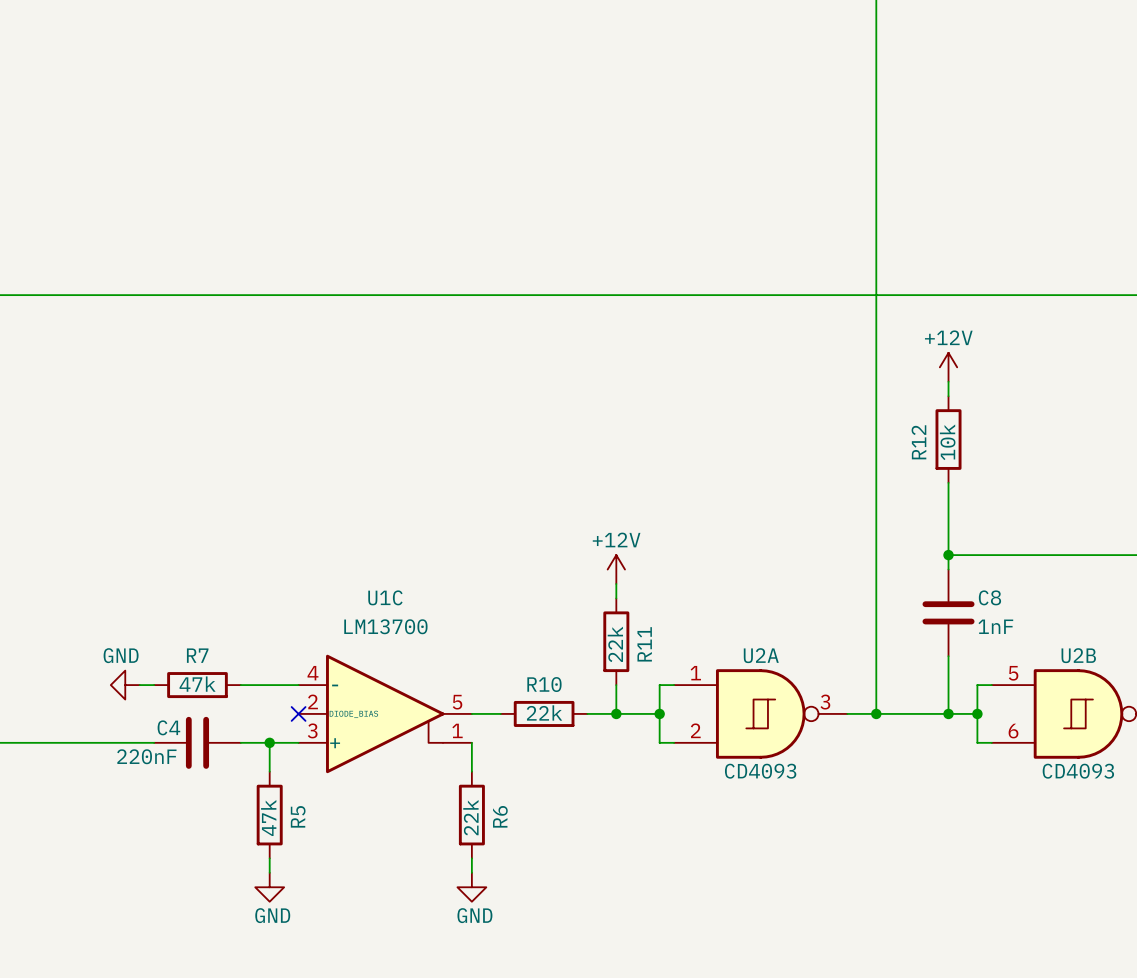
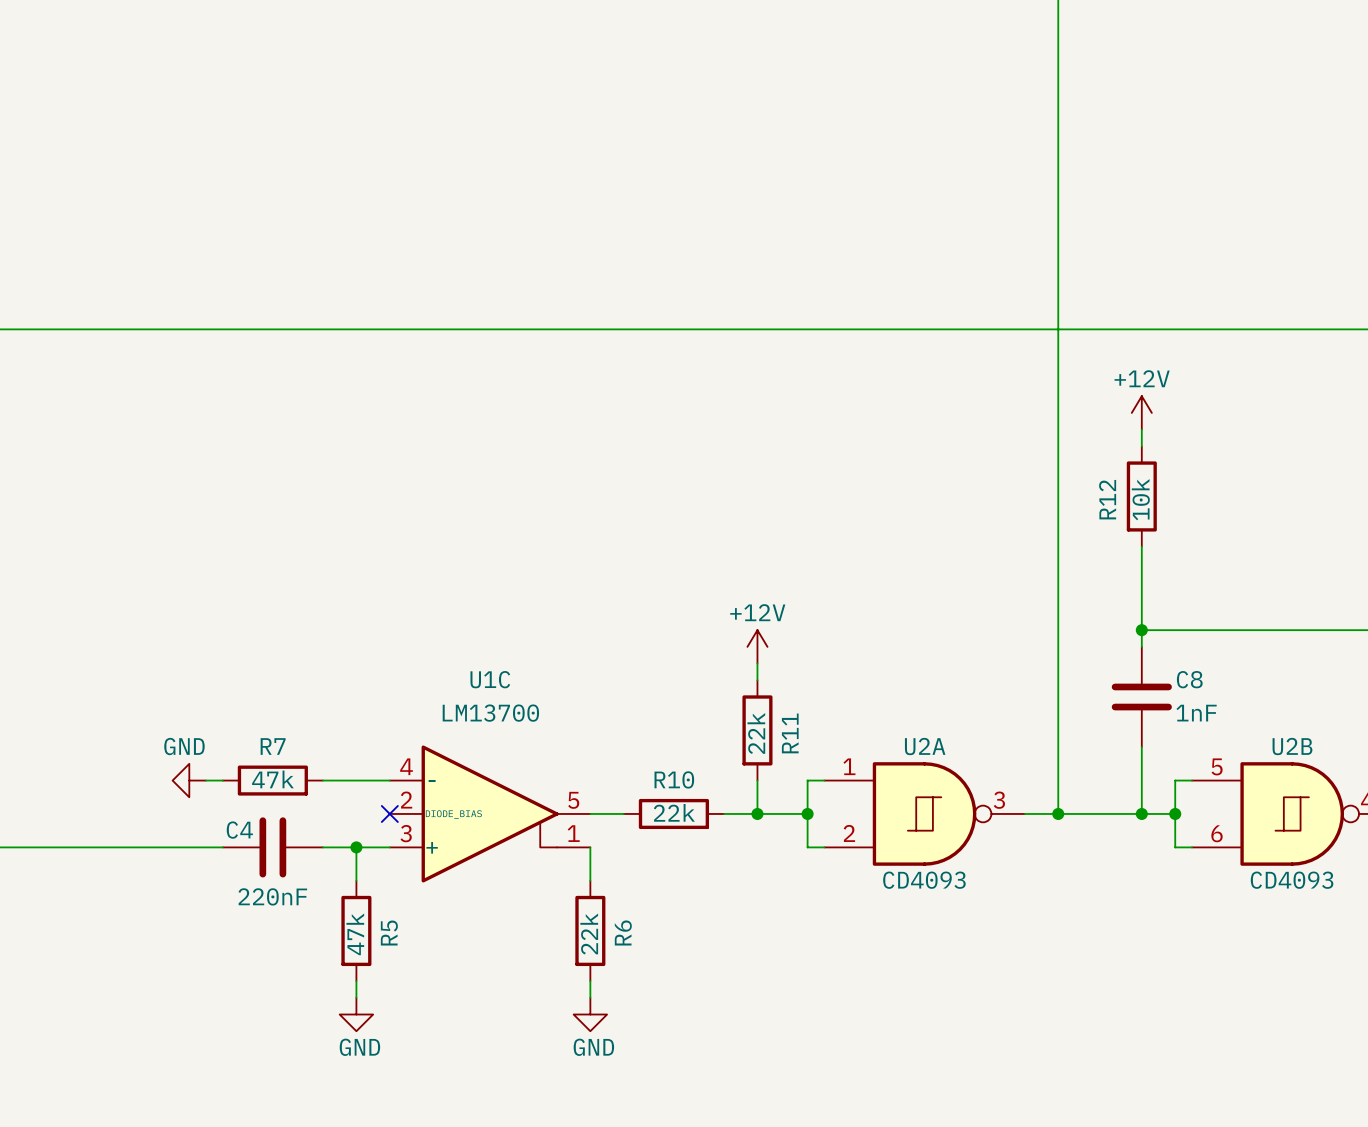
C4 value position: 220nF (146, 756) -> 220nF (272, 896)

